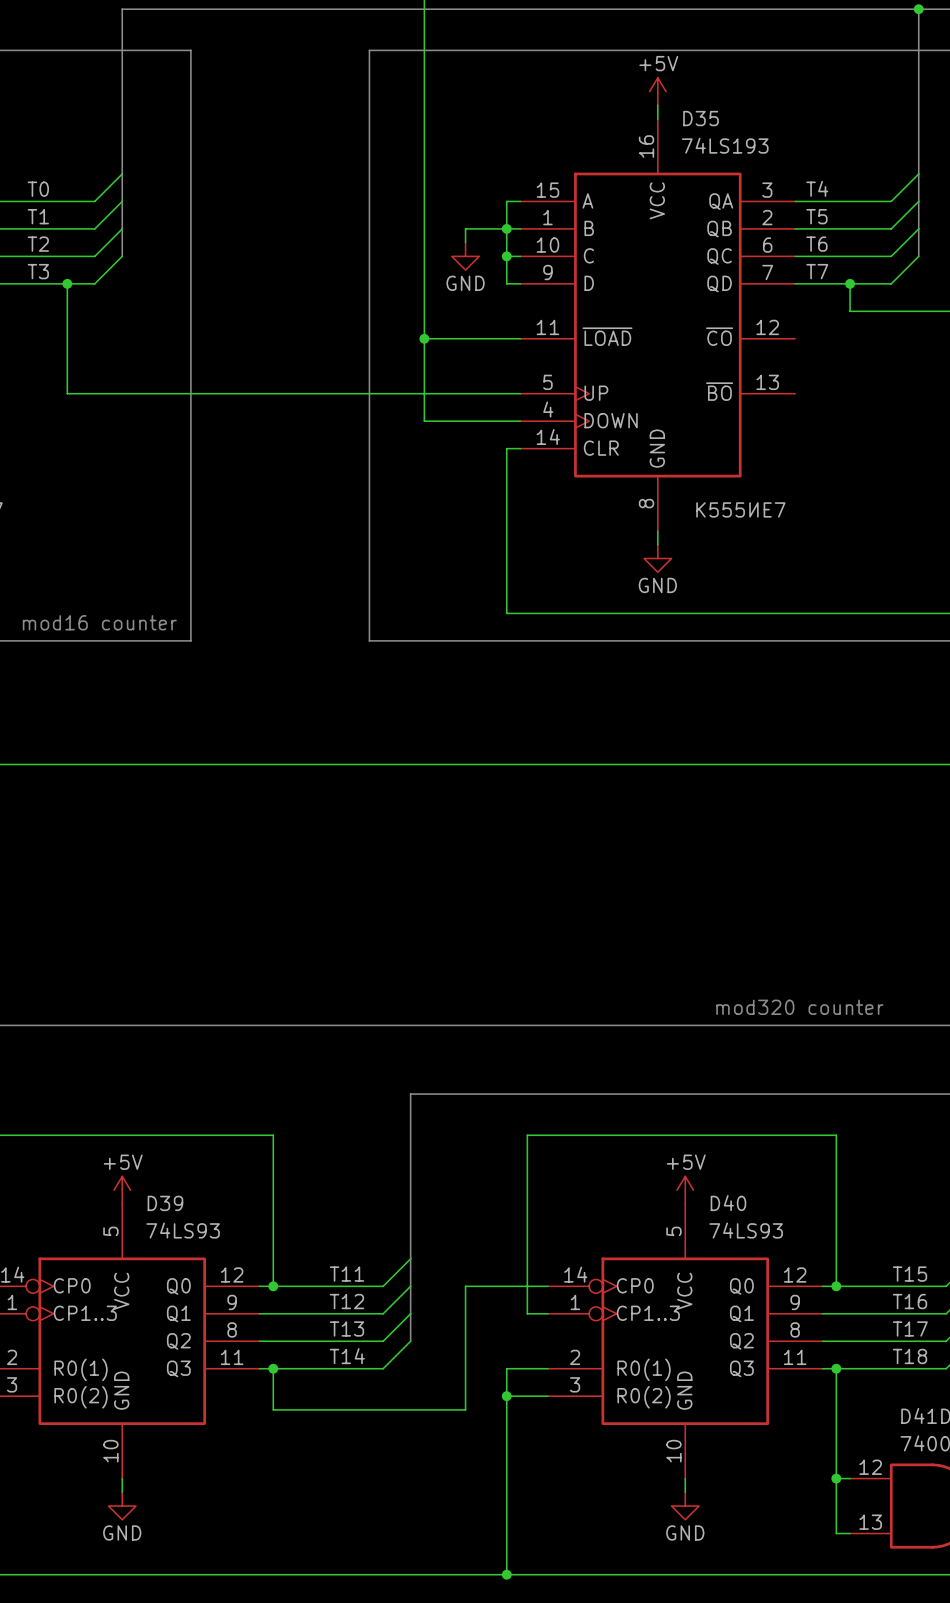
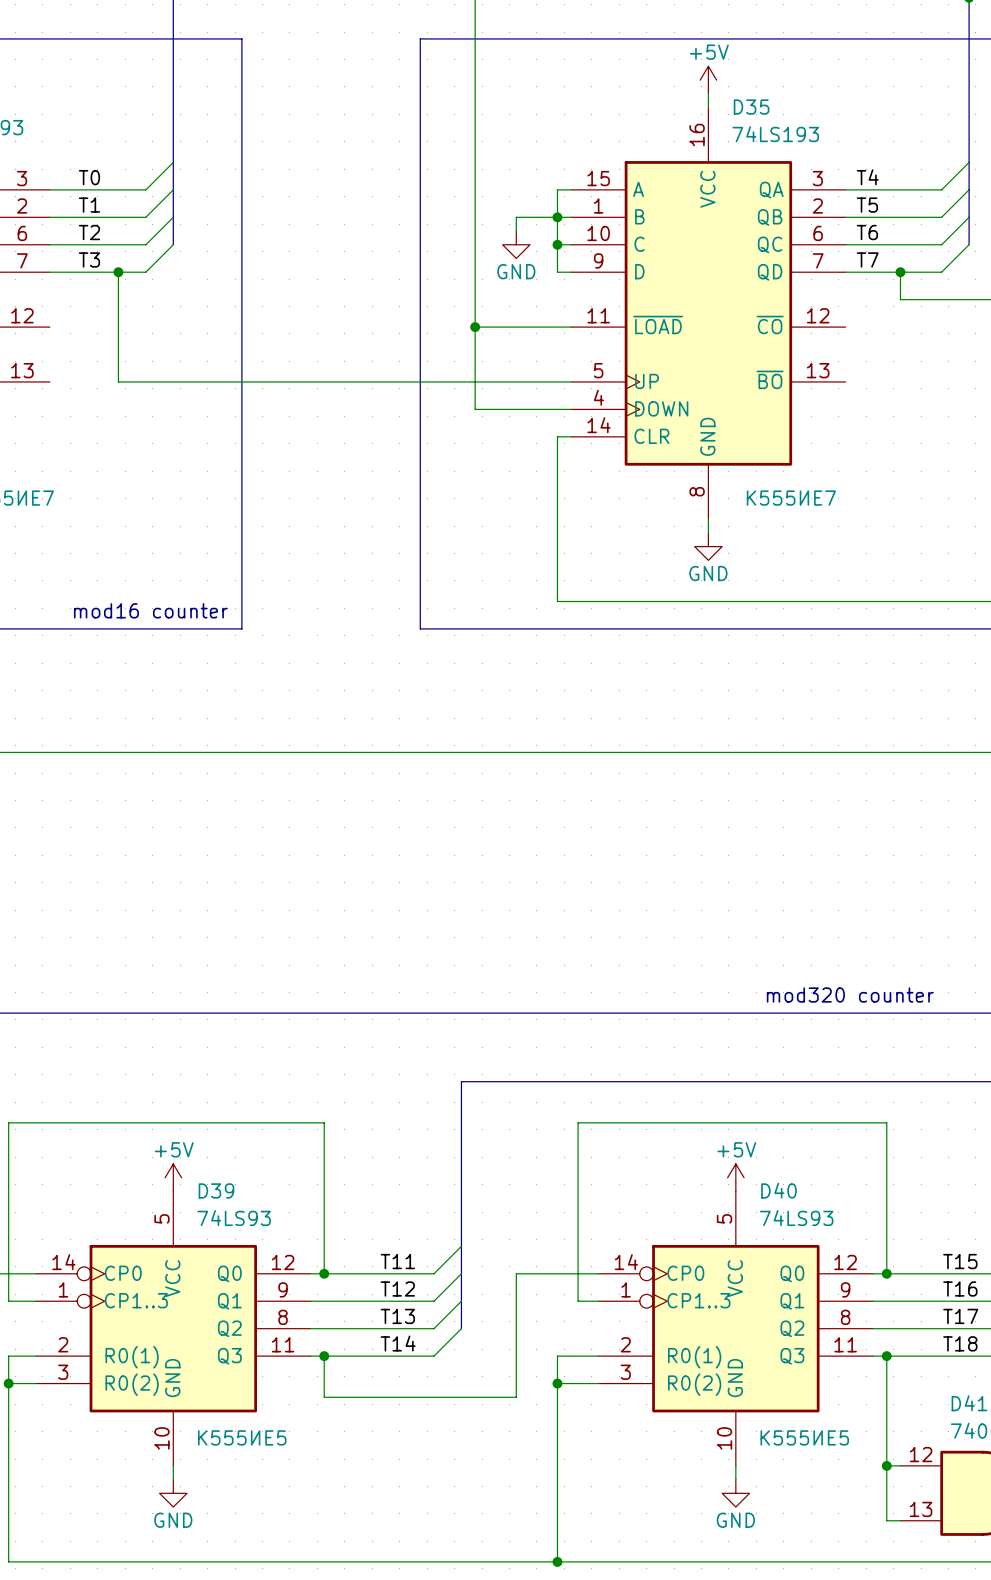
D39 text: none -> К555ИЕ5 (242, 1437)
D40 text: none -> К555ИЕ5 (804, 1437)

